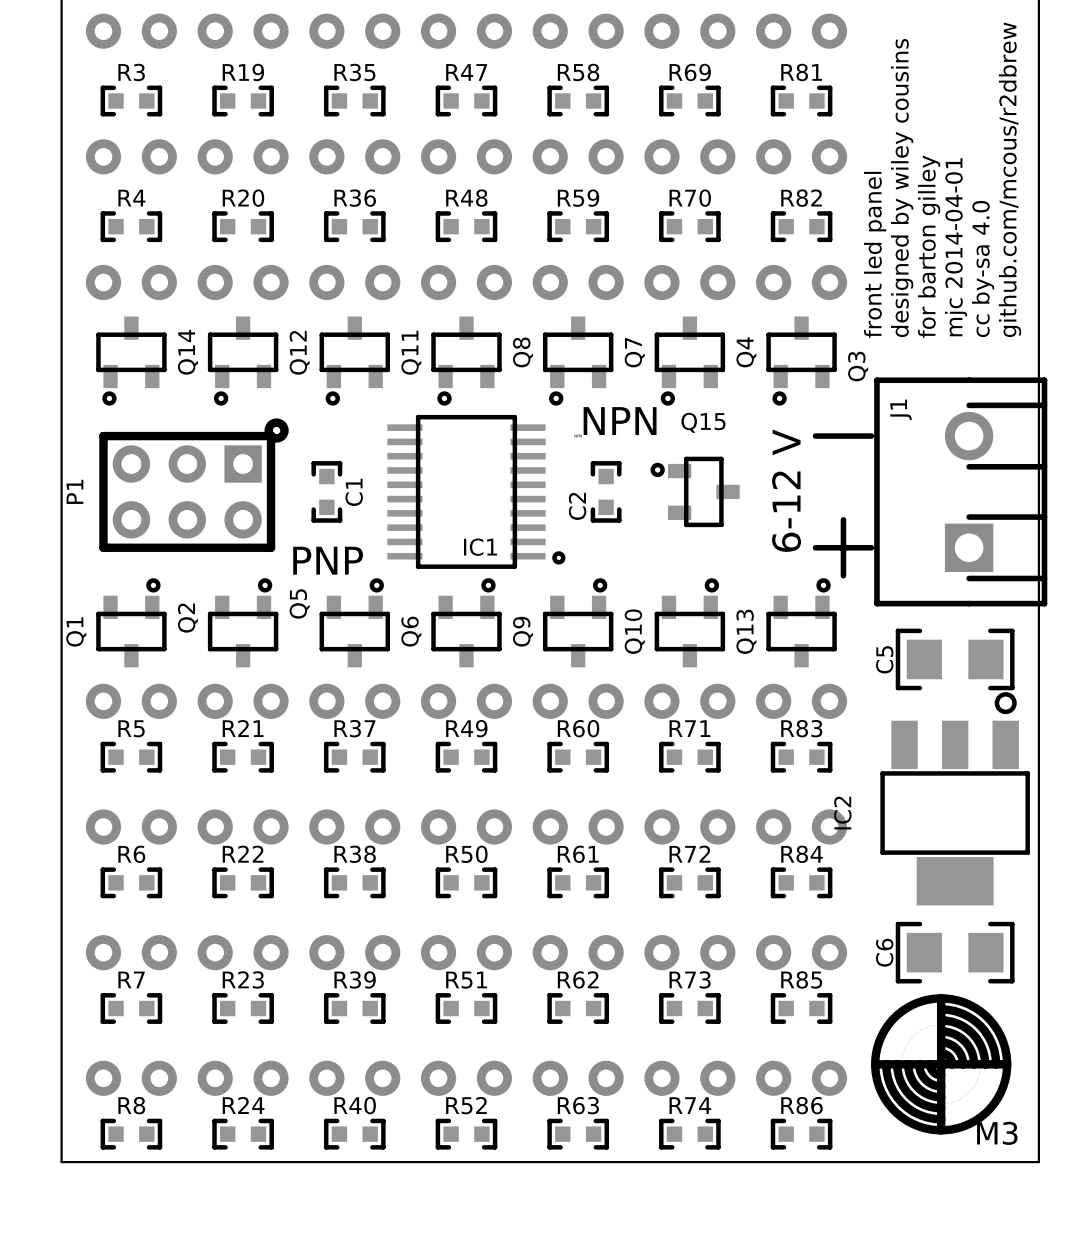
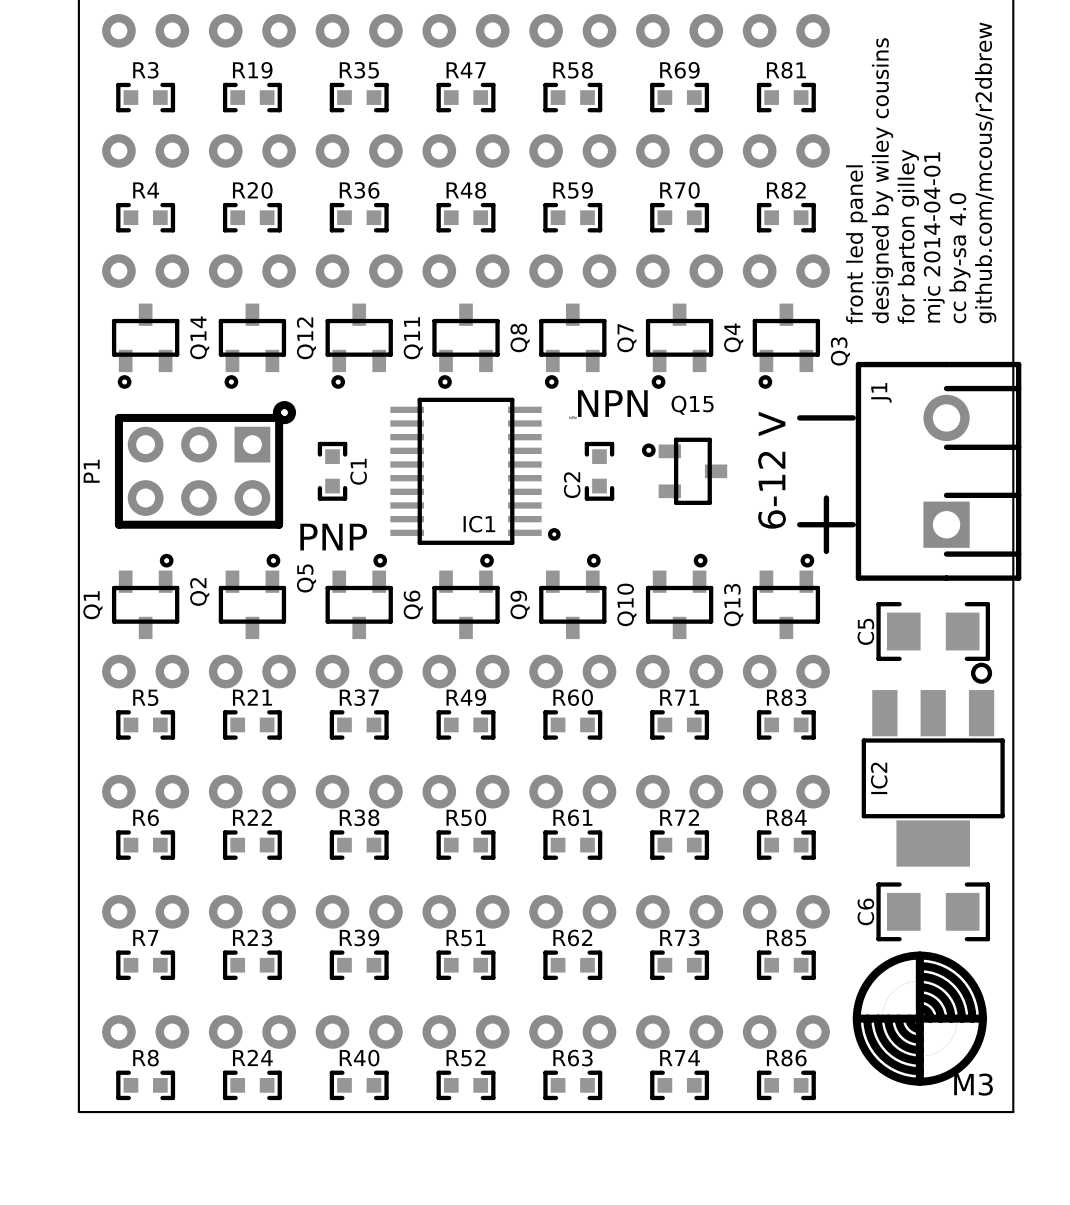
IC2 name position: IC2 (842, 813) -> IC2 (879, 778)

